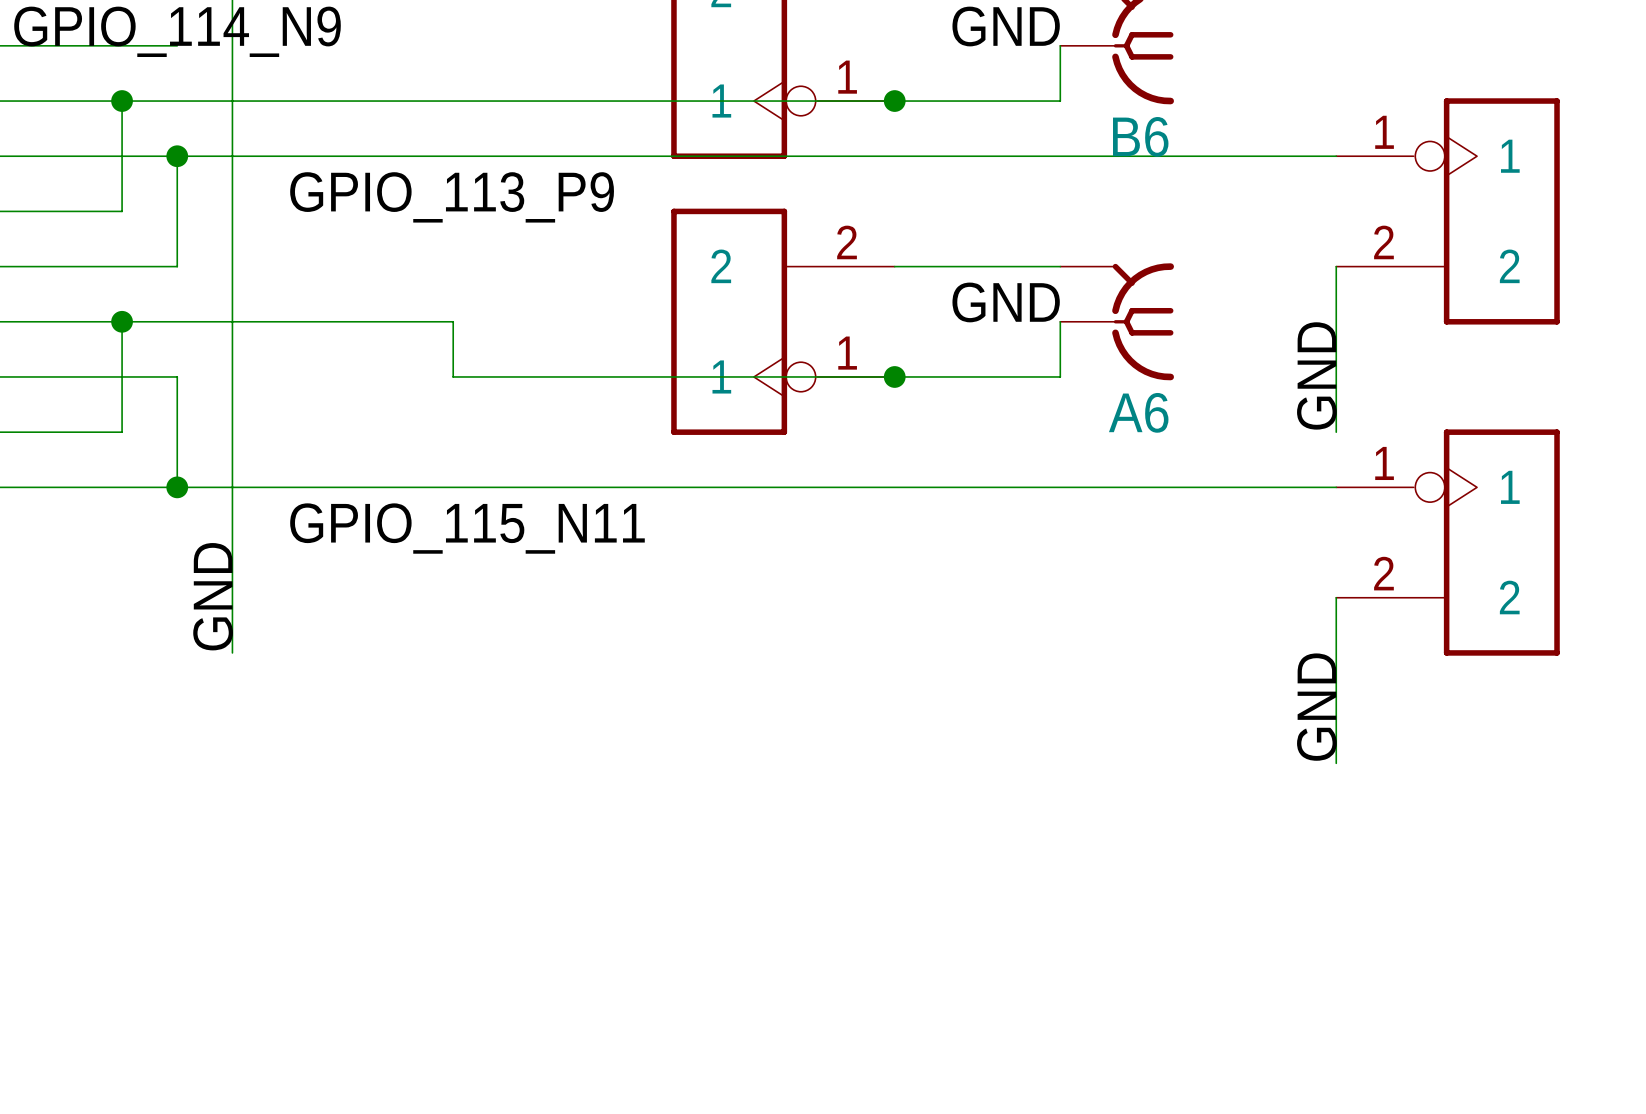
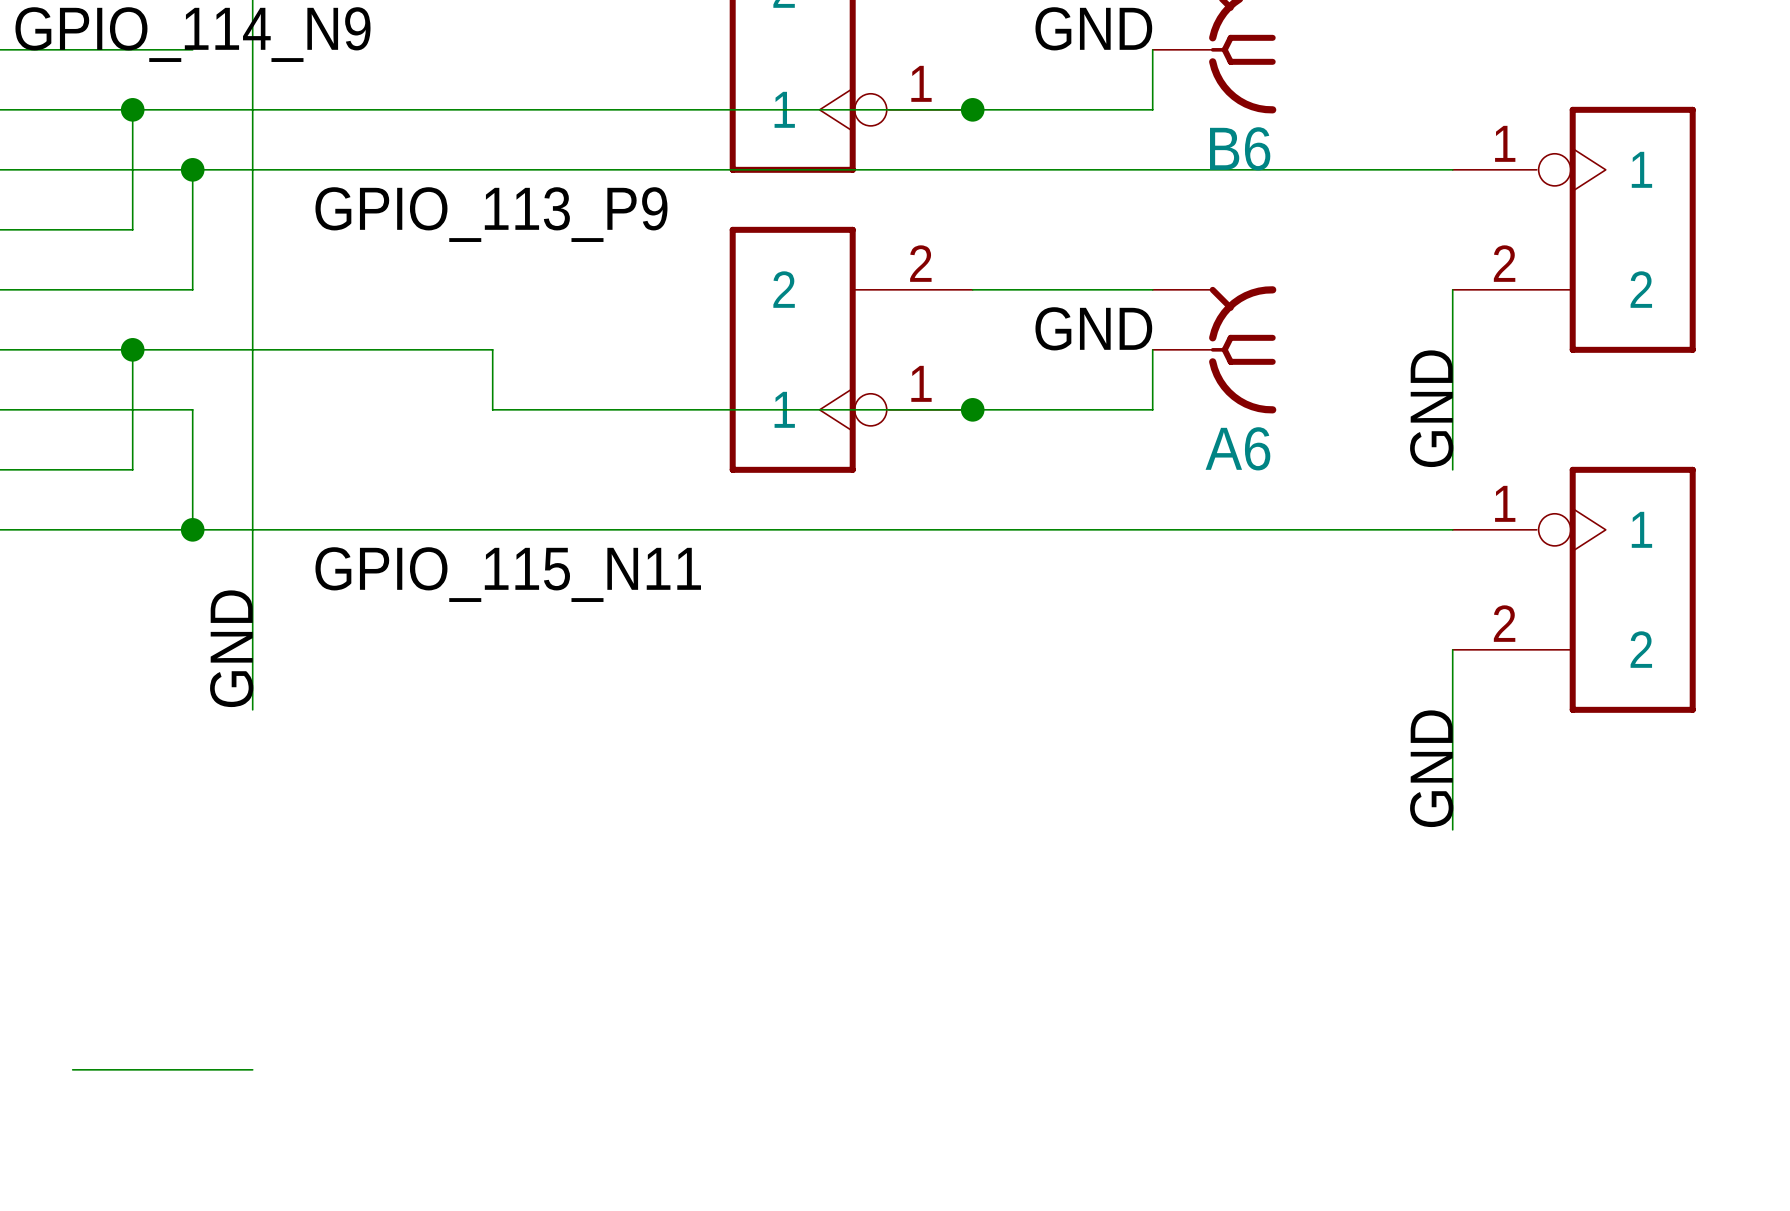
wire: none -> (72, 1069) (252, 1069)

